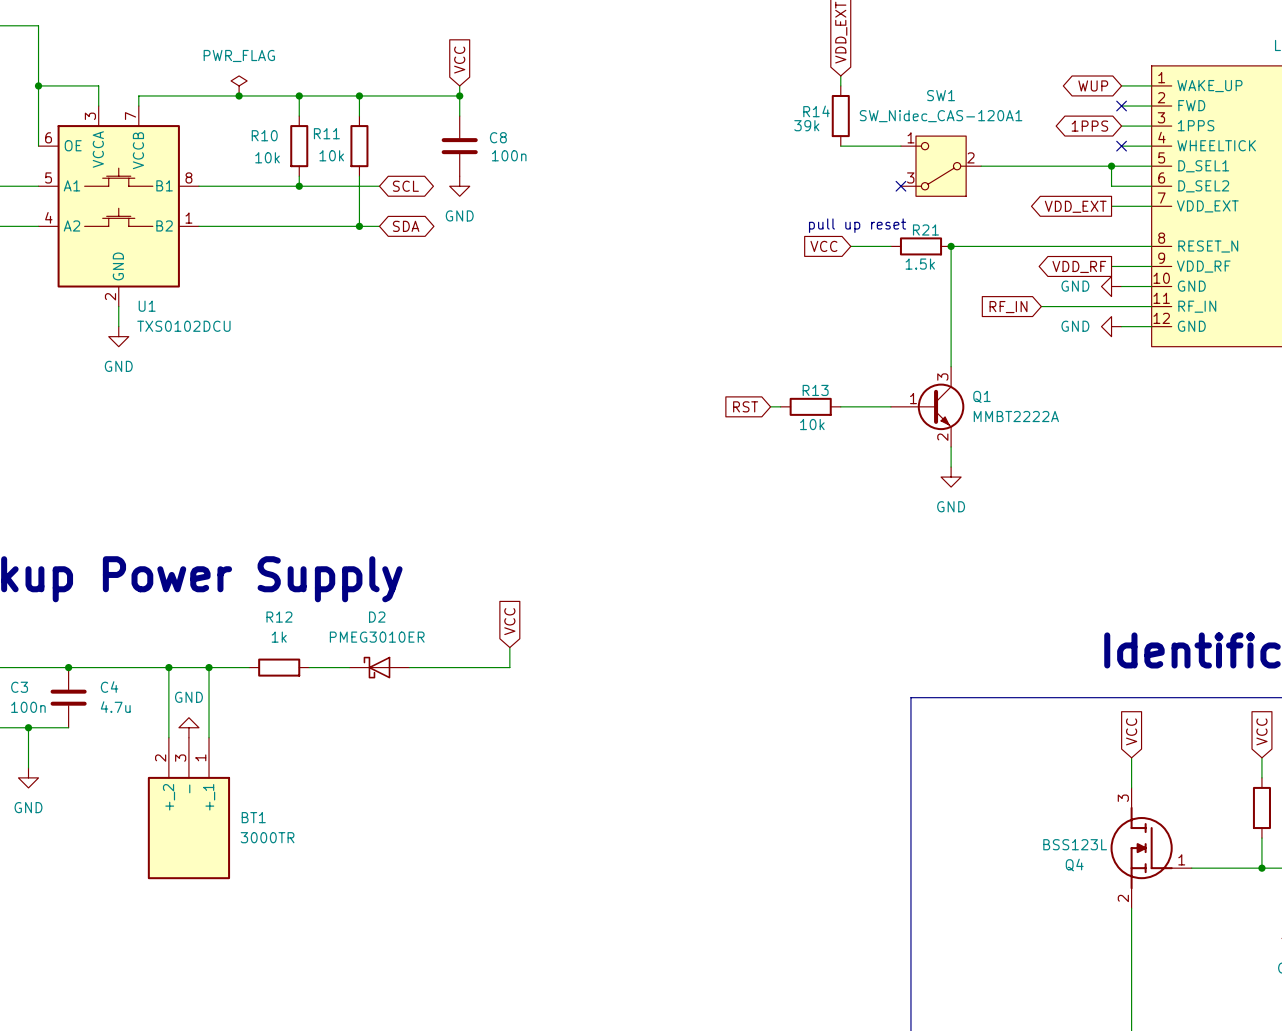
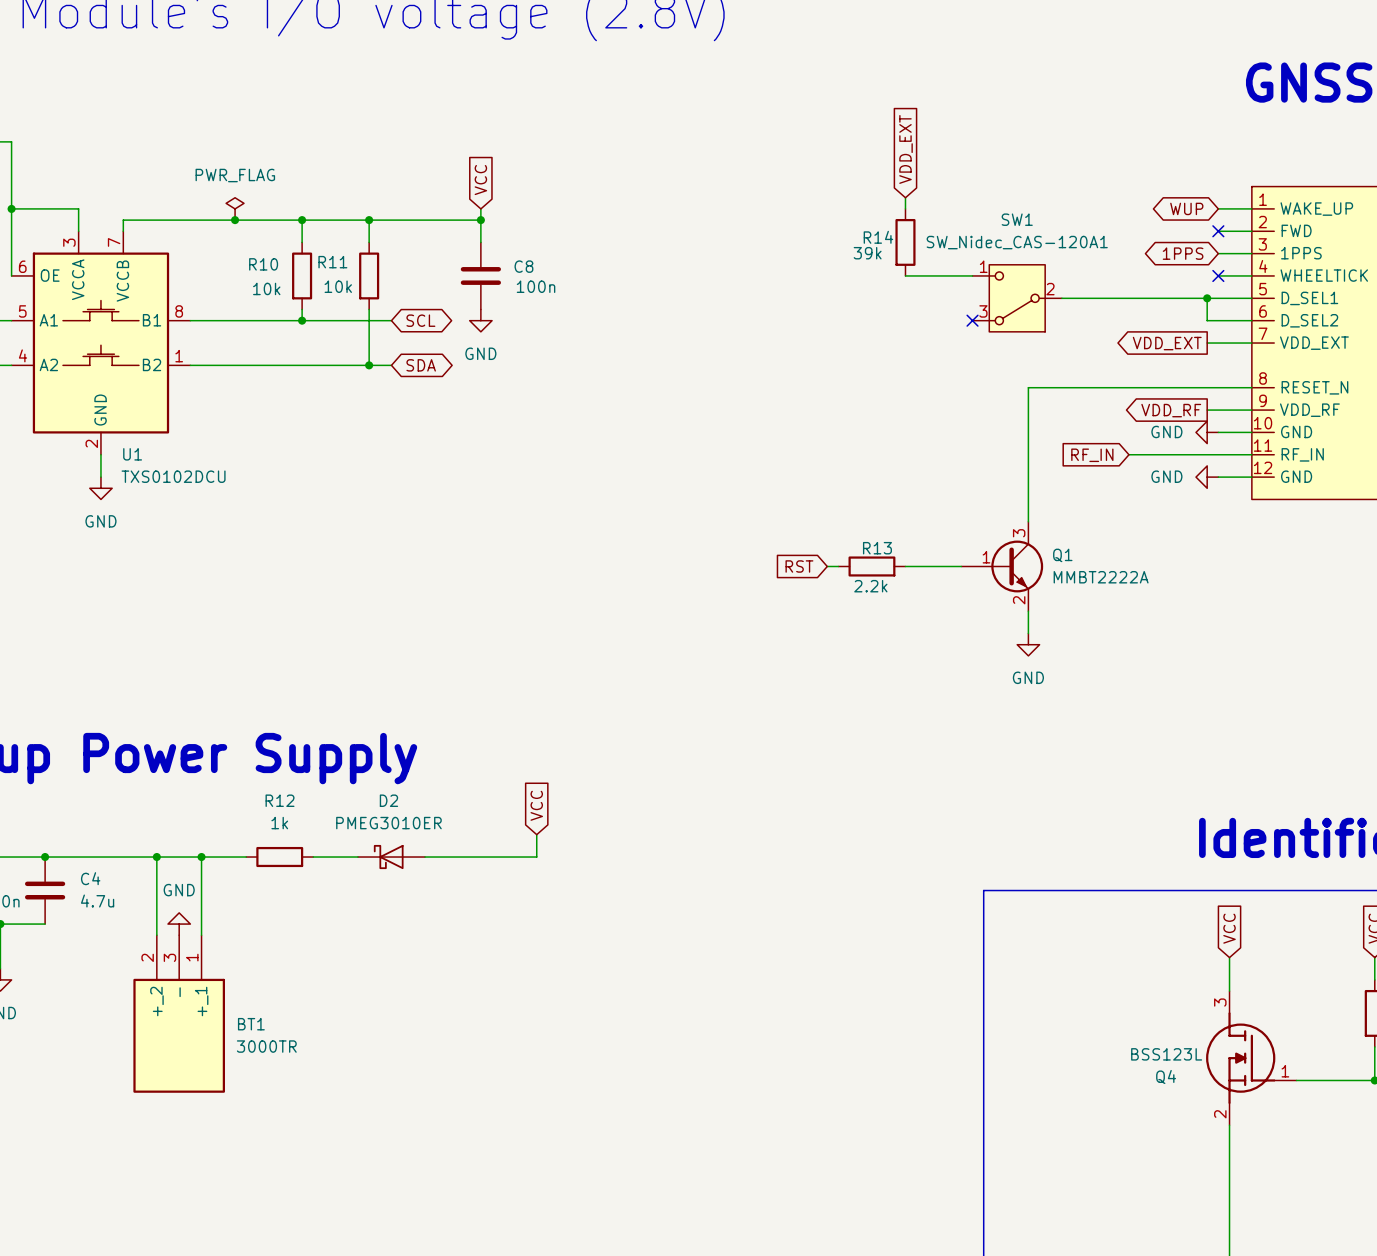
text: pull up reset (857, 225) -> none
global label: VCC (823, 246) -> none
wire: (850, 246) (890, 246) -> none
R21: 1.5k (921, 246) -> none
junction: (951, 246) -> none
R13 value: 10k (812, 424) -> 2.2k (870, 586)

